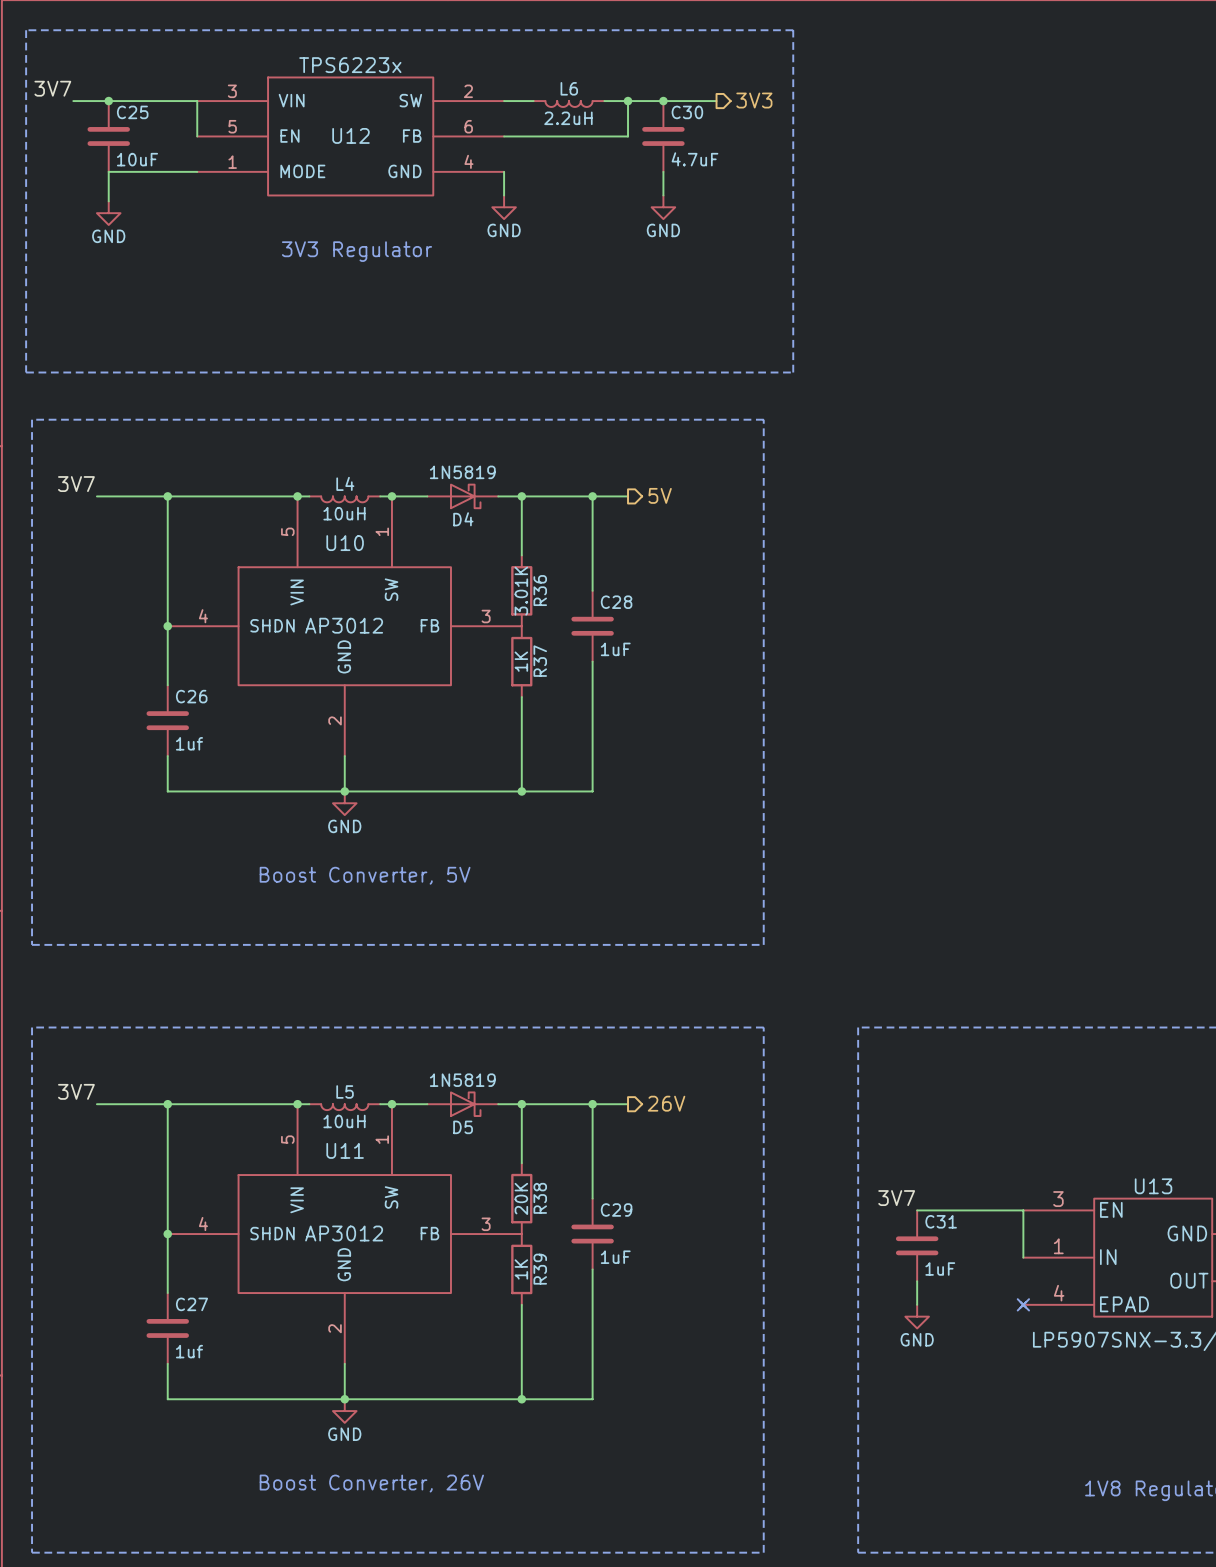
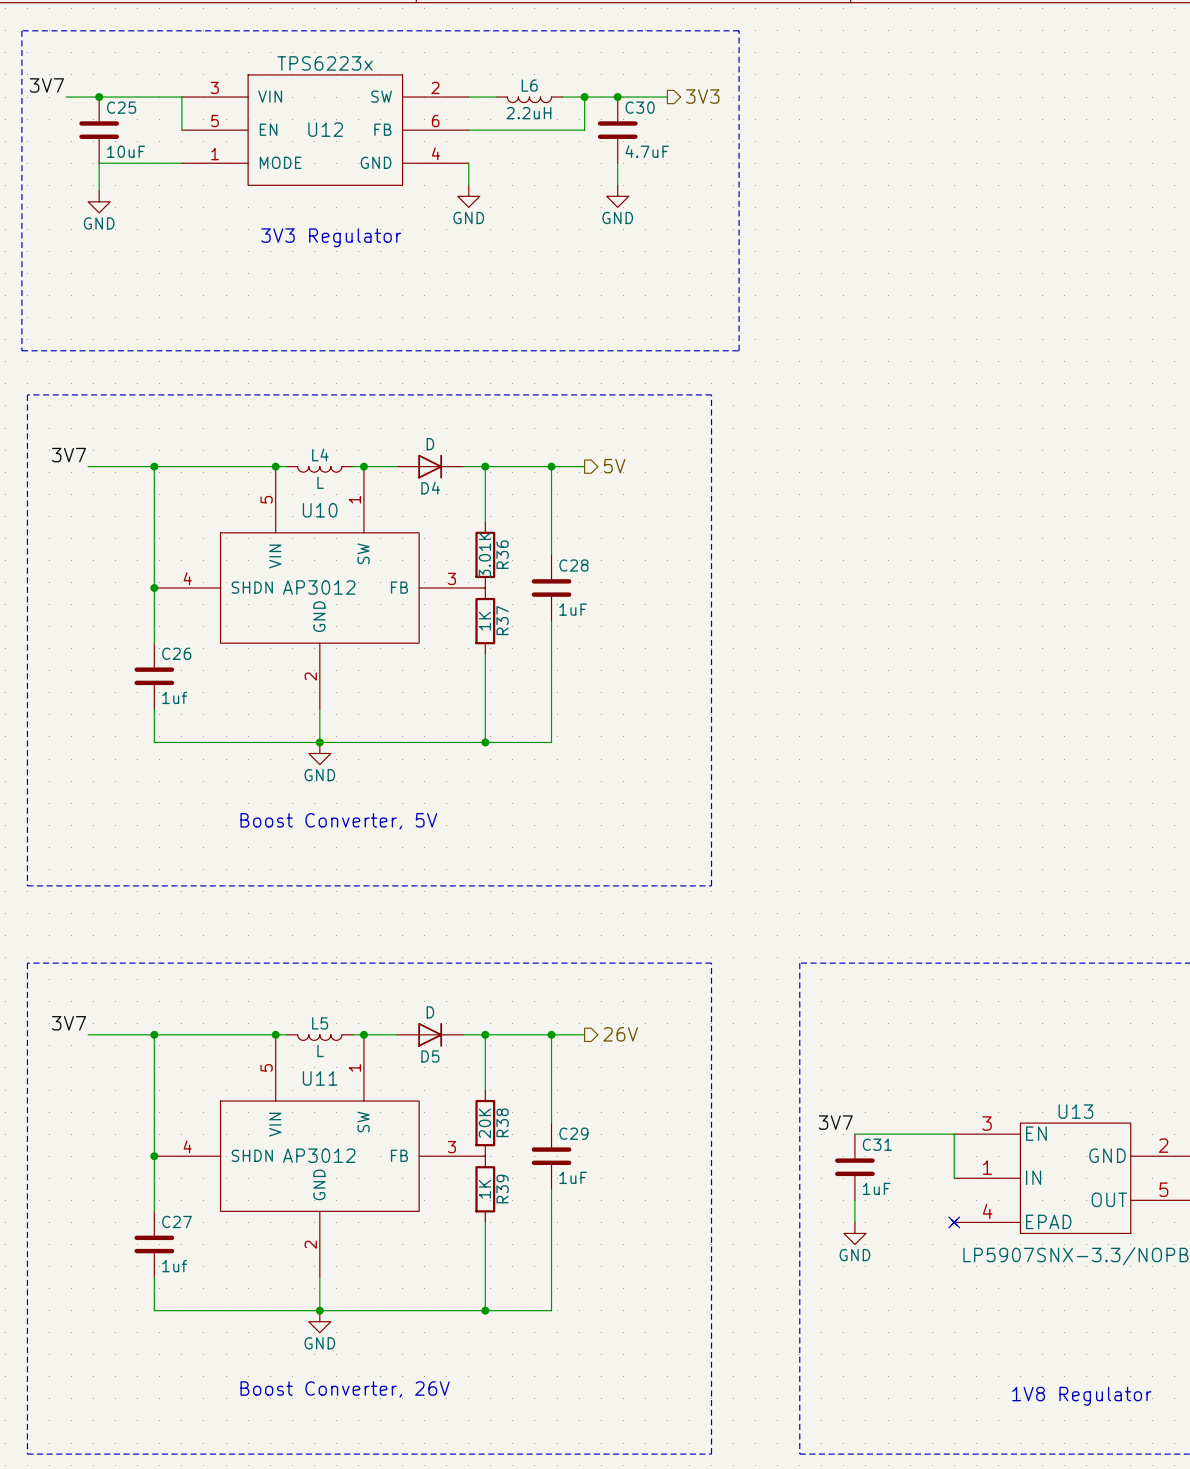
D4 value: 1N5819 (462, 472) -> D (430, 444)
D4 symbol: [427, 483, 499, 510] -> [397, 454, 464, 479]
L4 value: 10uH (344, 513) -> L (320, 482)
D5 value: 1N5819 (462, 1080) -> D (430, 1012)
D5 symbol: [427, 1091, 499, 1117] -> [397, 1022, 464, 1047]
L5 value: 10uH (344, 1121) -> L (320, 1050)

